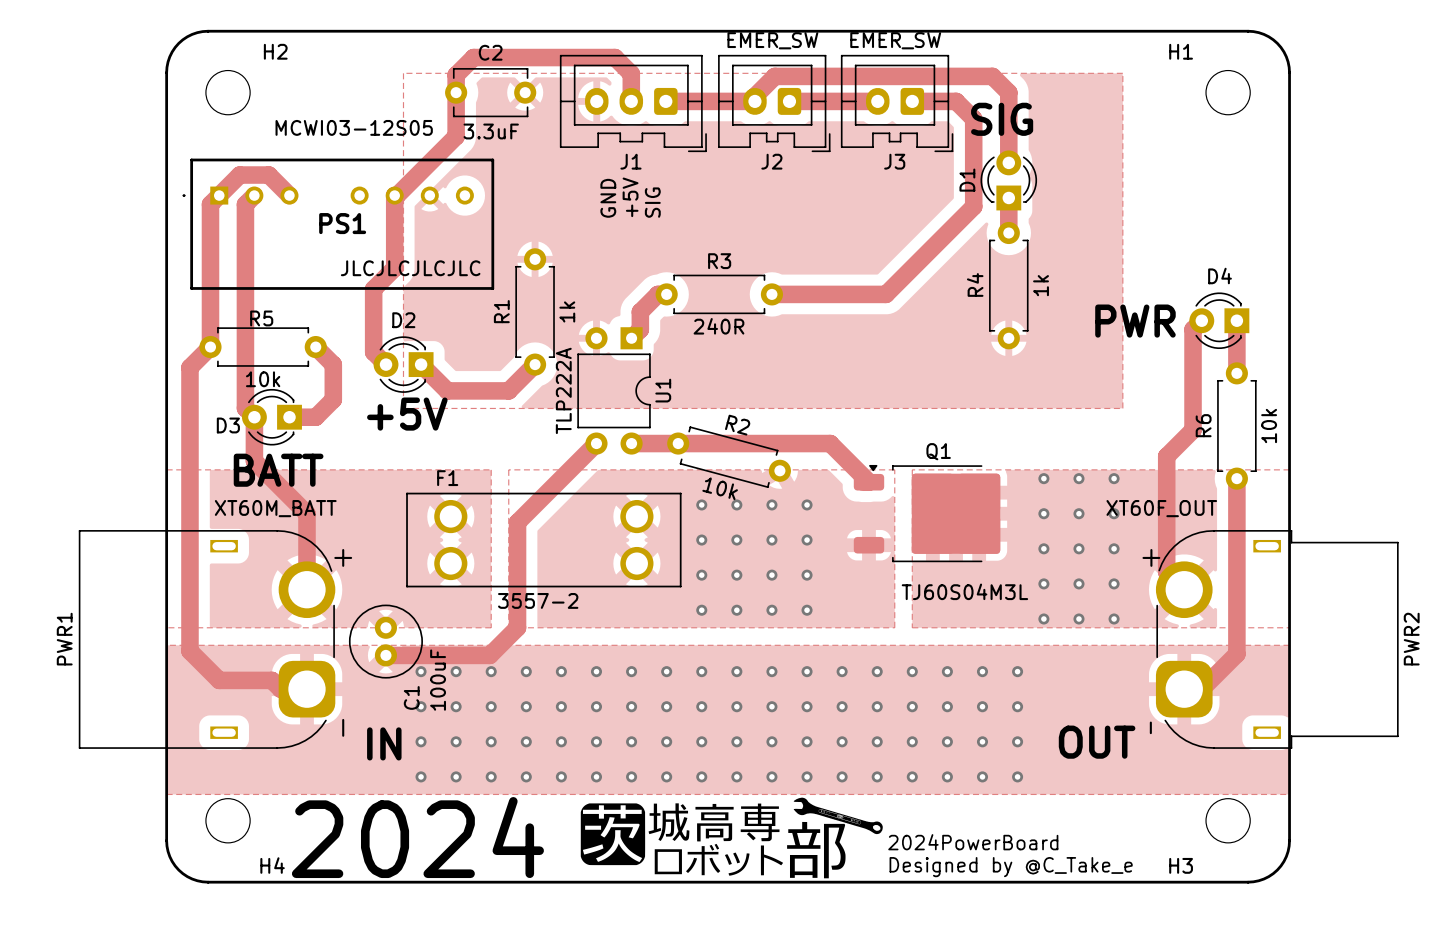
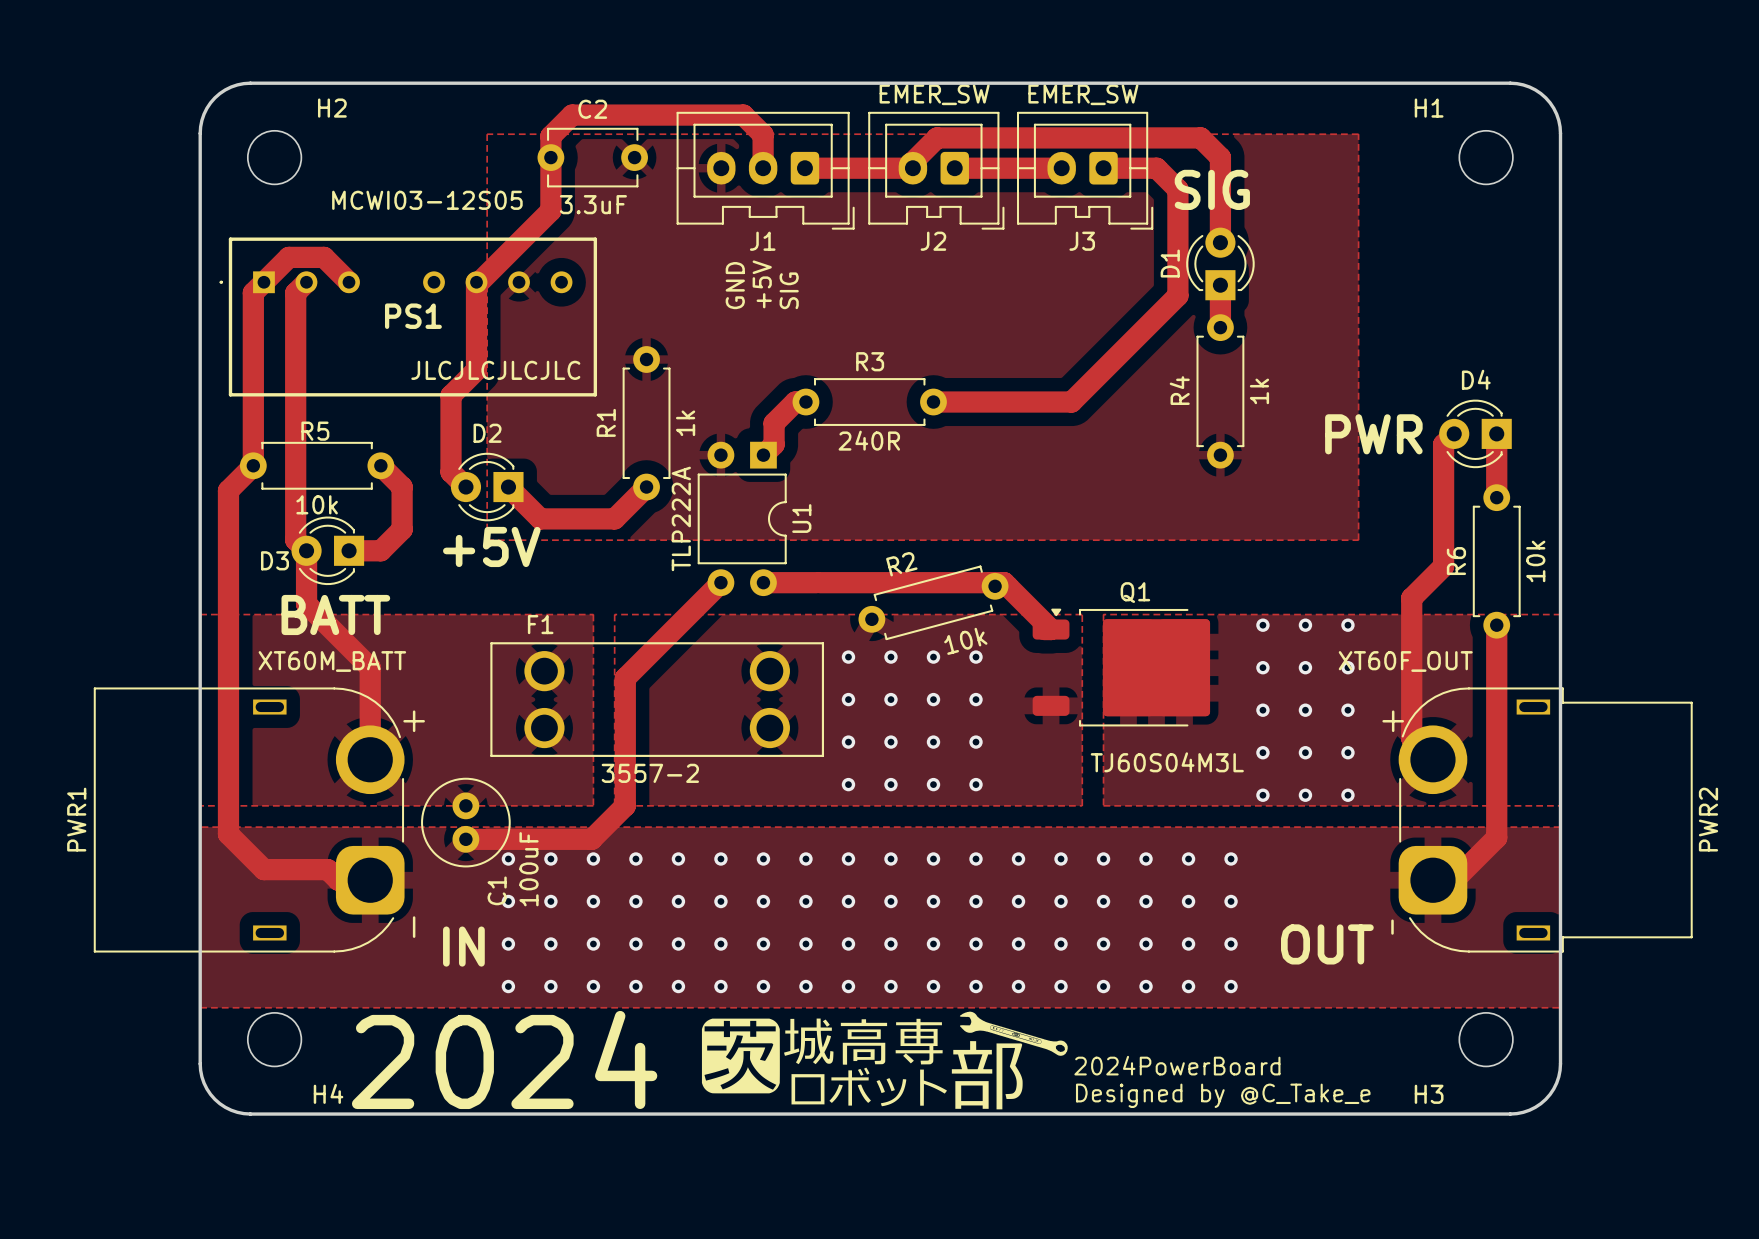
R2 rotation: 0° (729, 457) -> 30° counterclockwise (933, 602)

